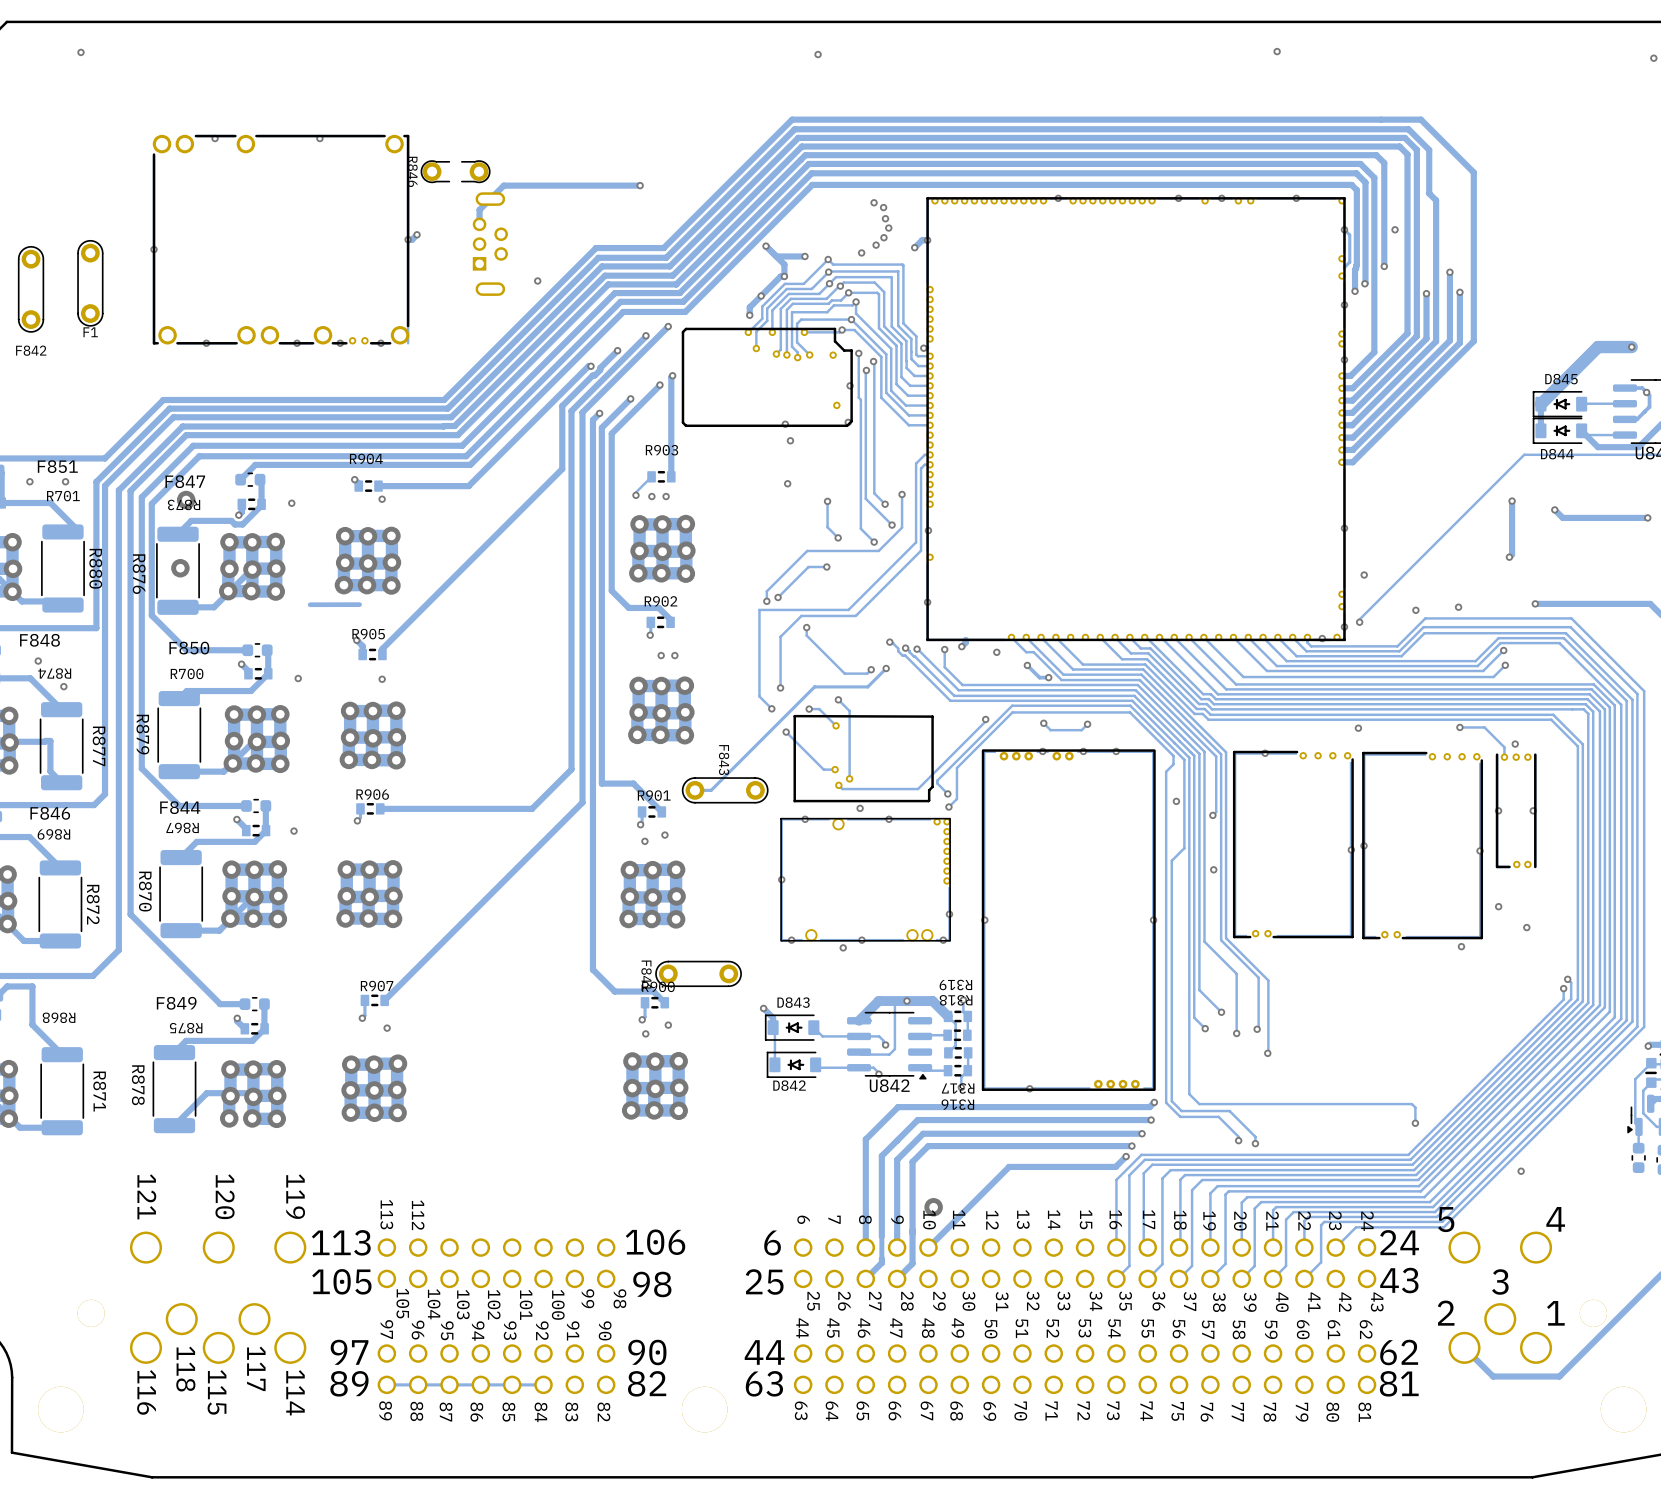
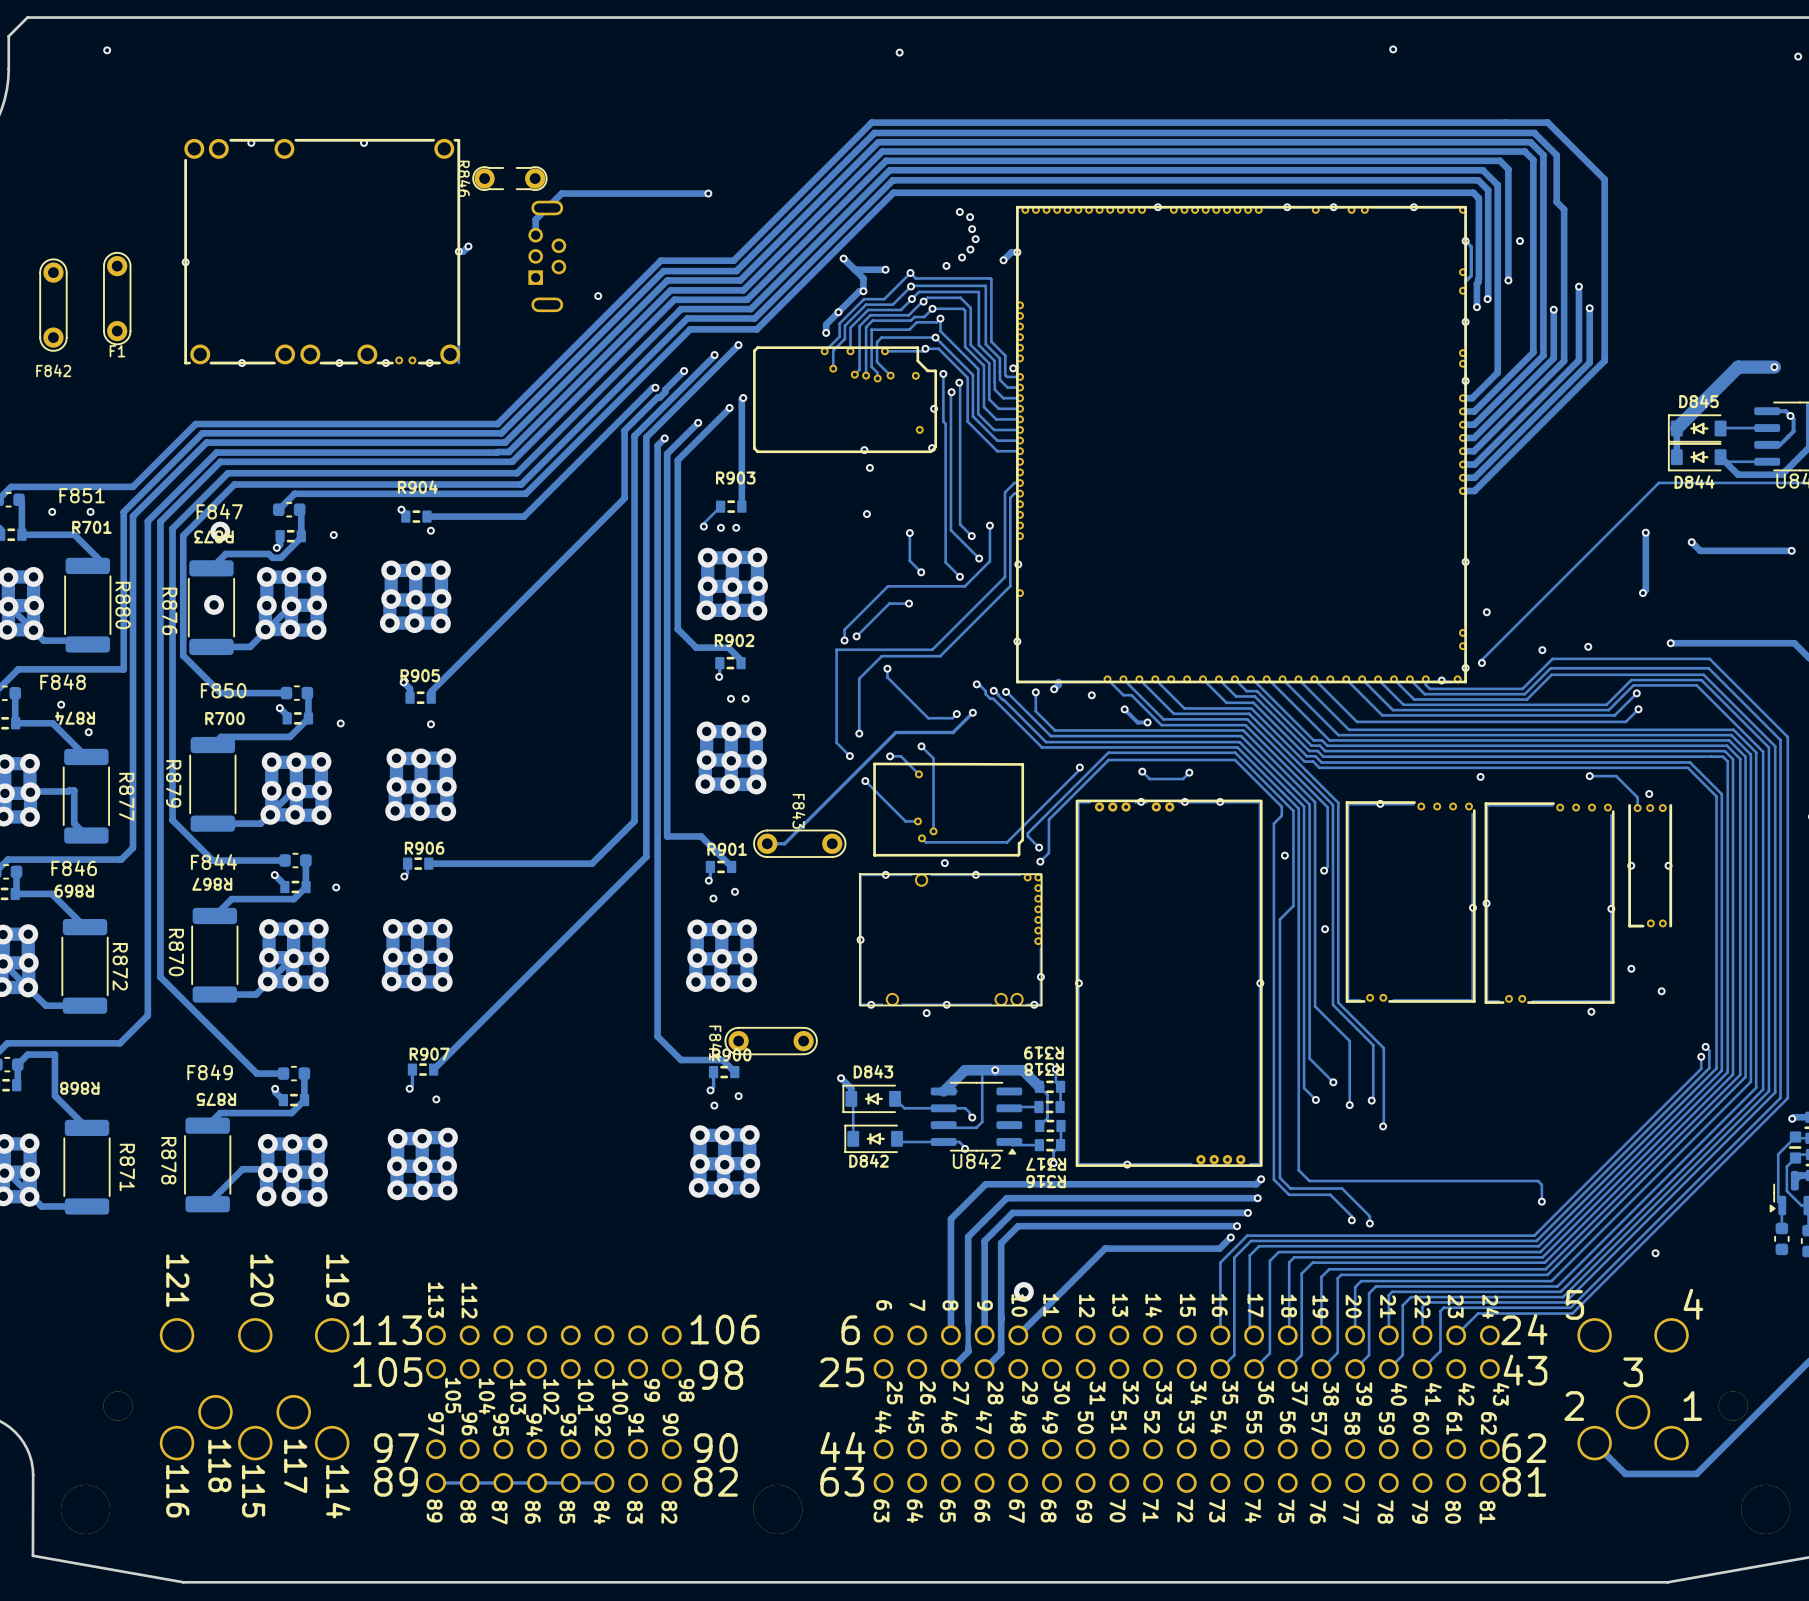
track: (359, 604) (310, 604) -> none

